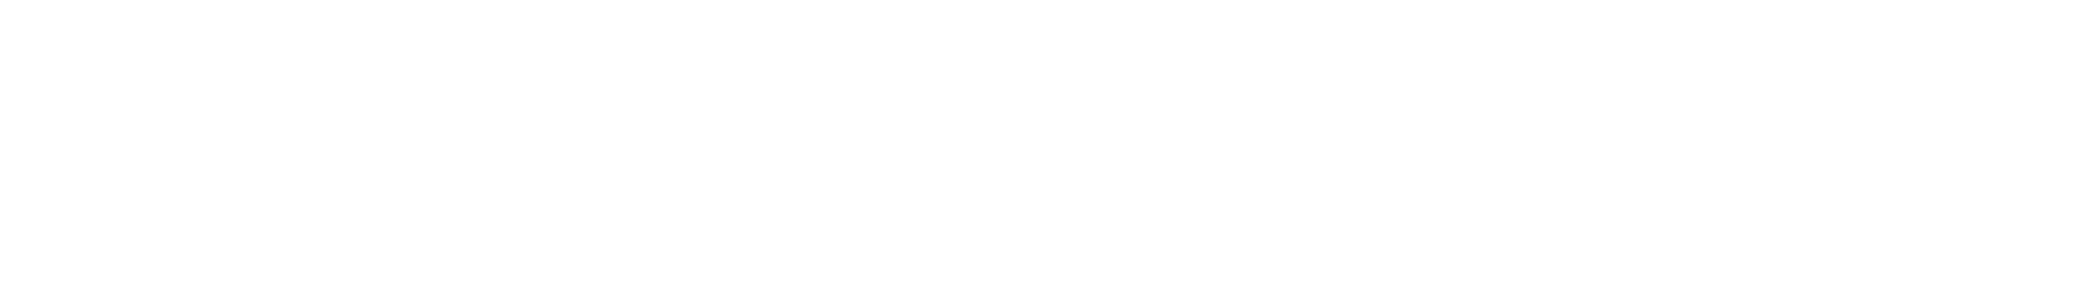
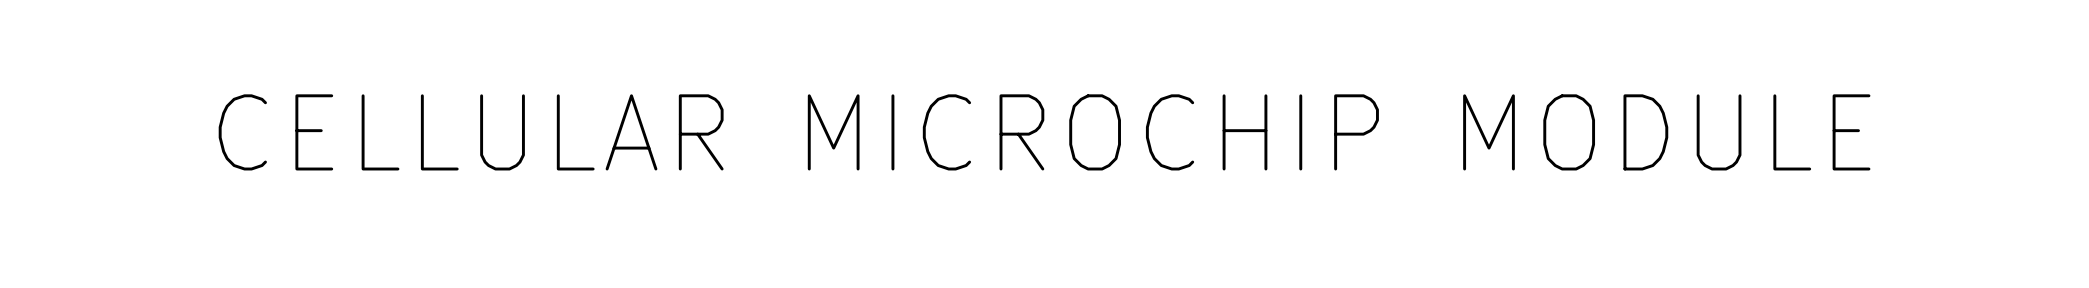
text: none -> CELLULAR MICROCHIP MODULE (1044, 132)

